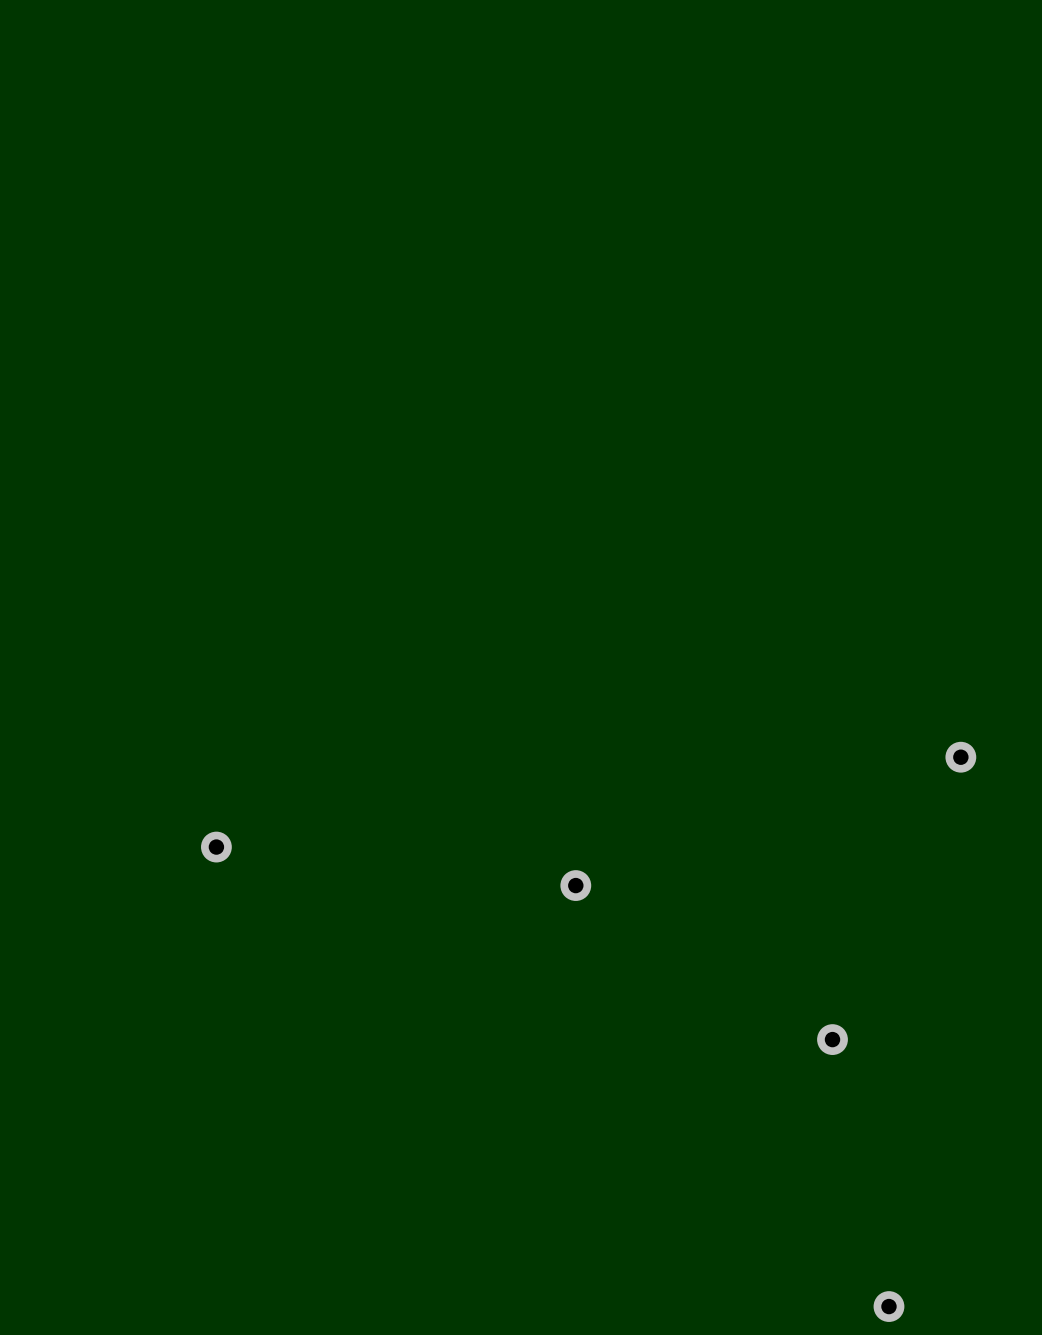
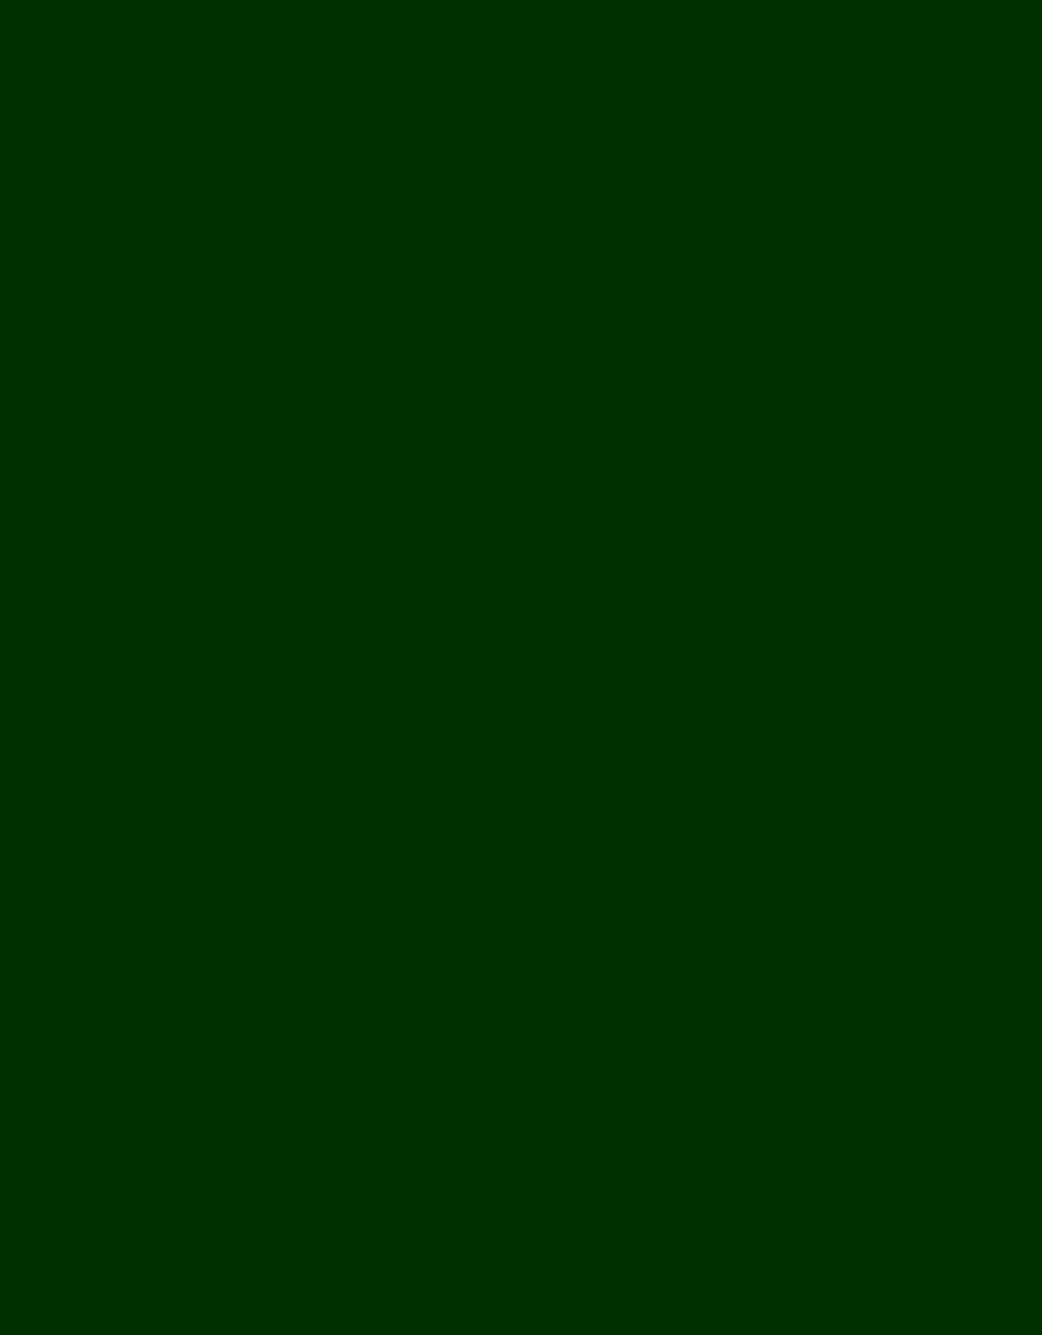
via: (960, 757) -> none
via: (216, 847) -> none
via: (575, 885) -> none
via: (832, 1039) -> none
via: (888, 1306) -> none

